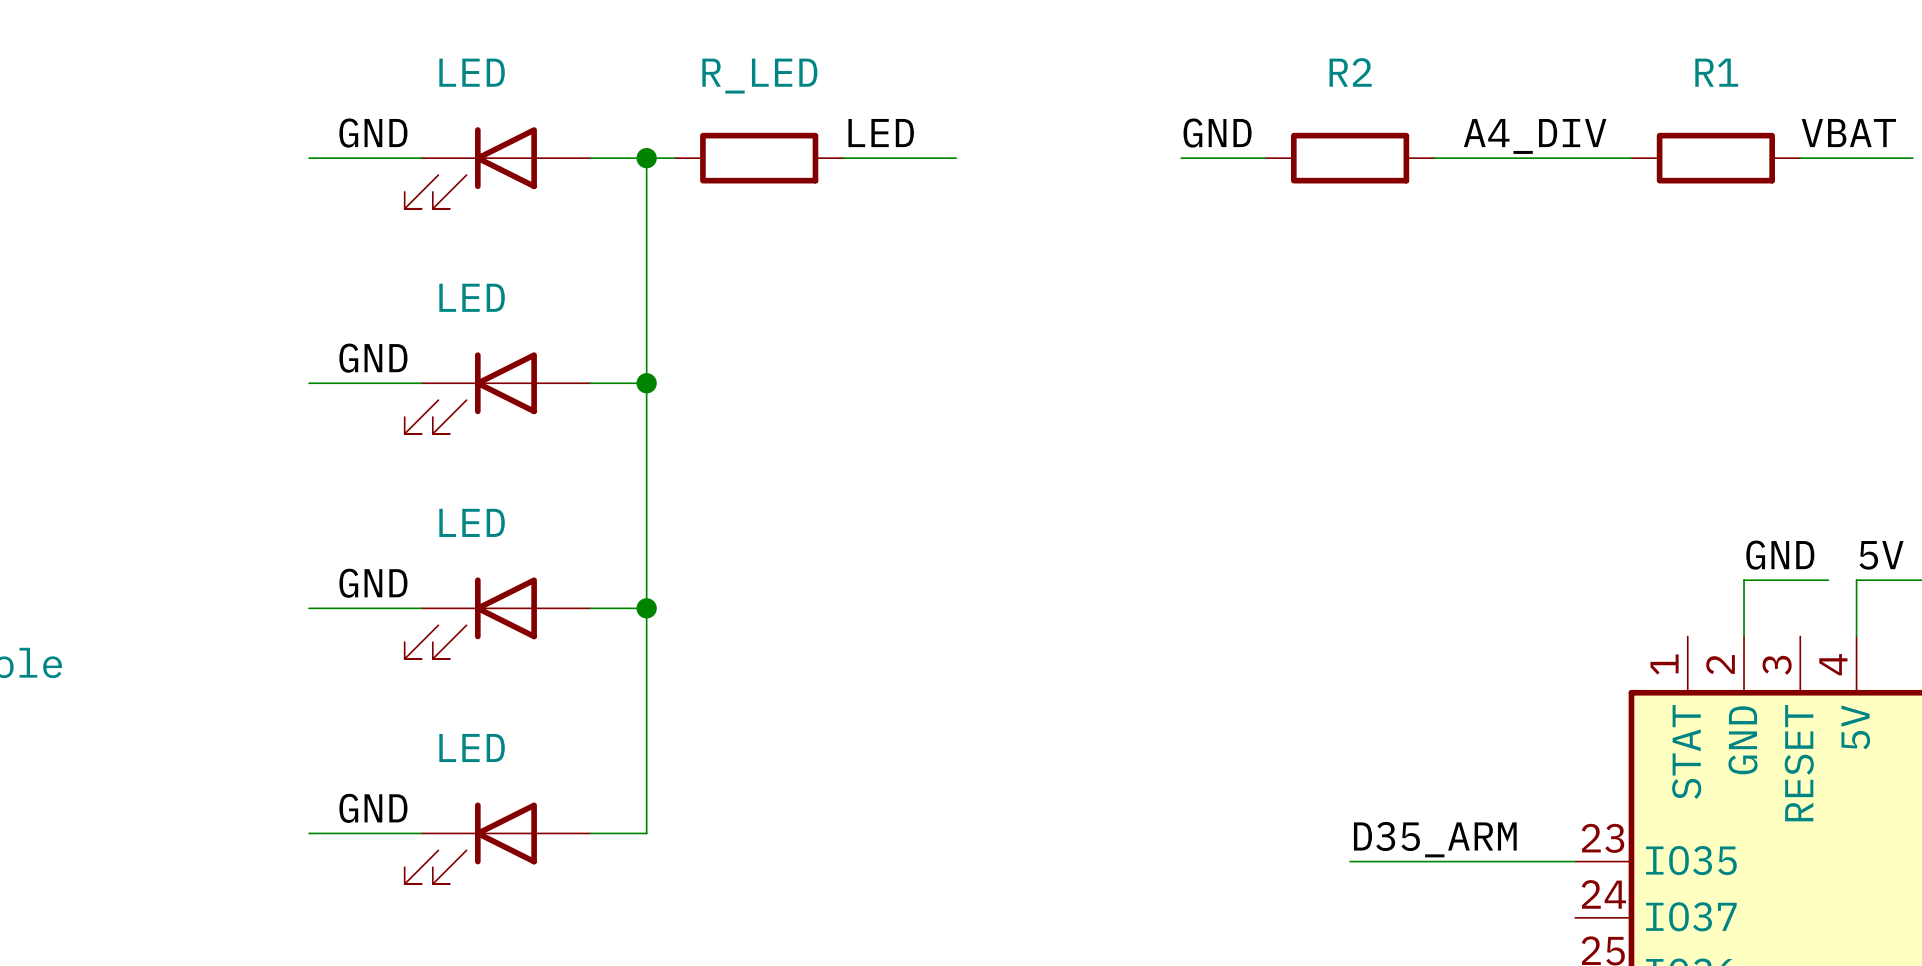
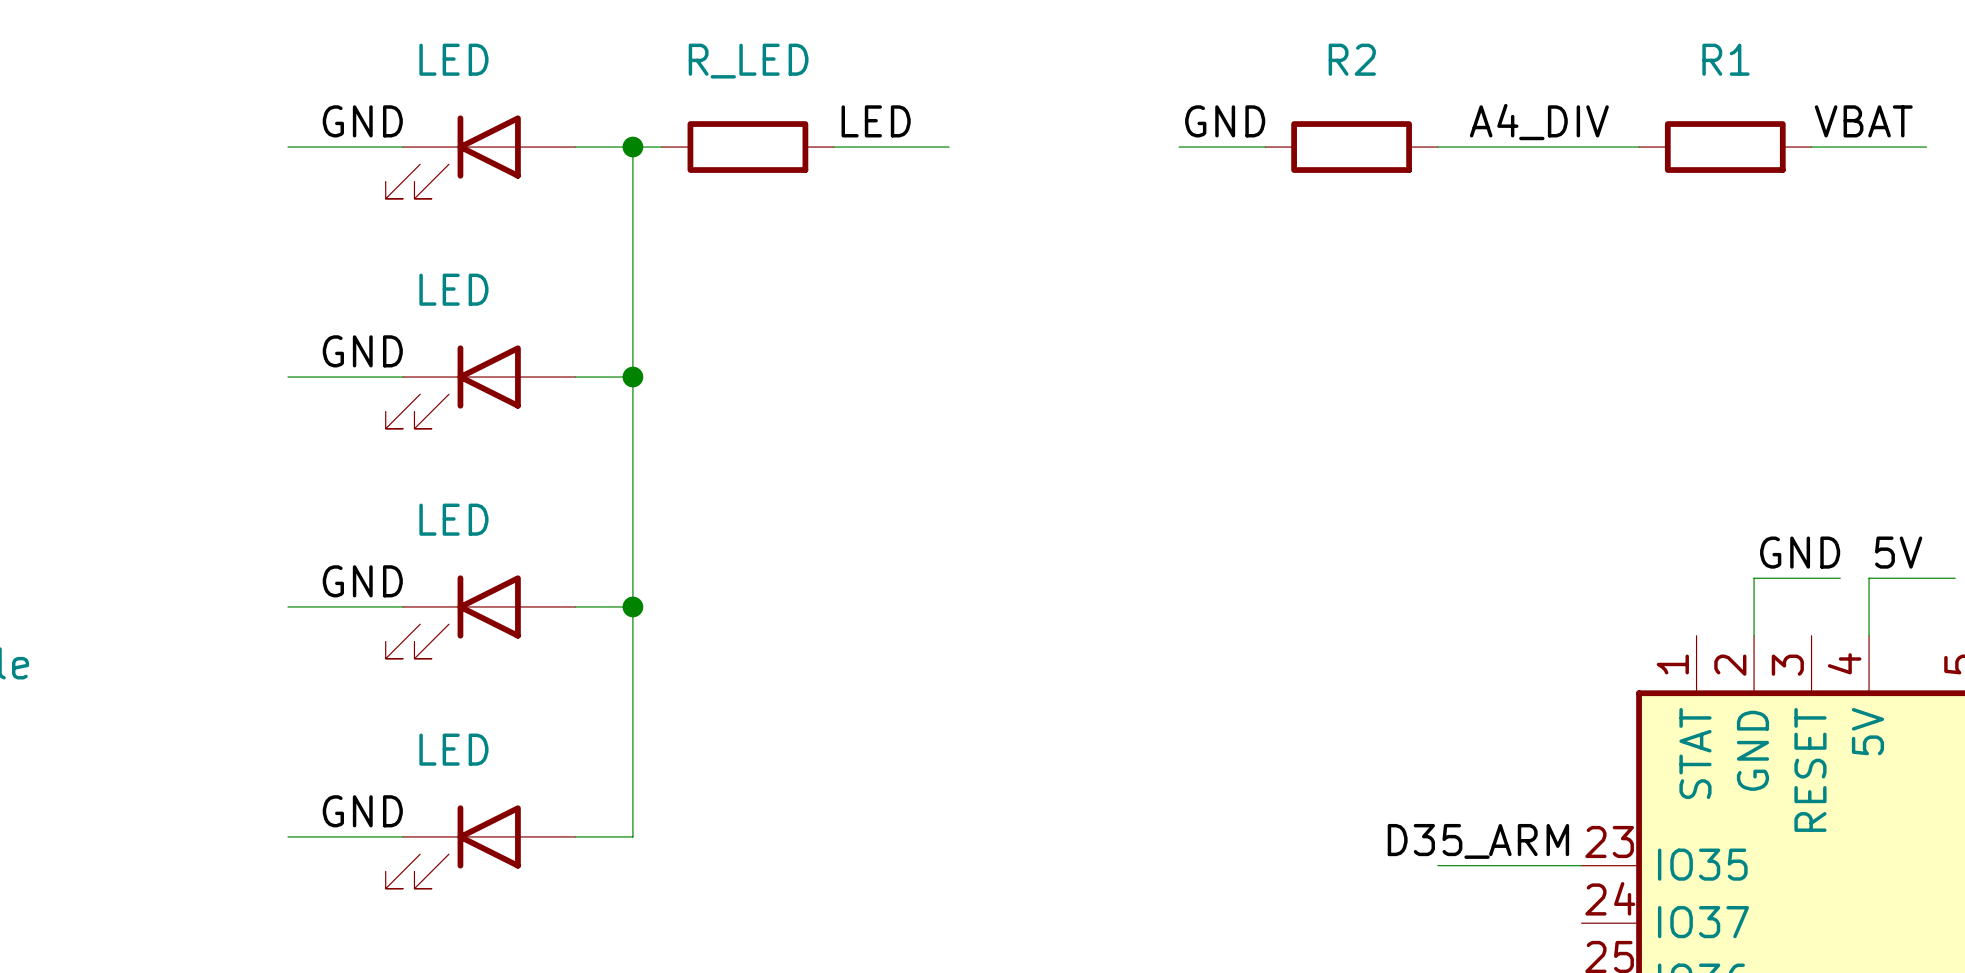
label position: D35_ARM (1435, 839) -> D35_ARM (1478, 841)
wire: (1350, 861) (1434, 861) -> none

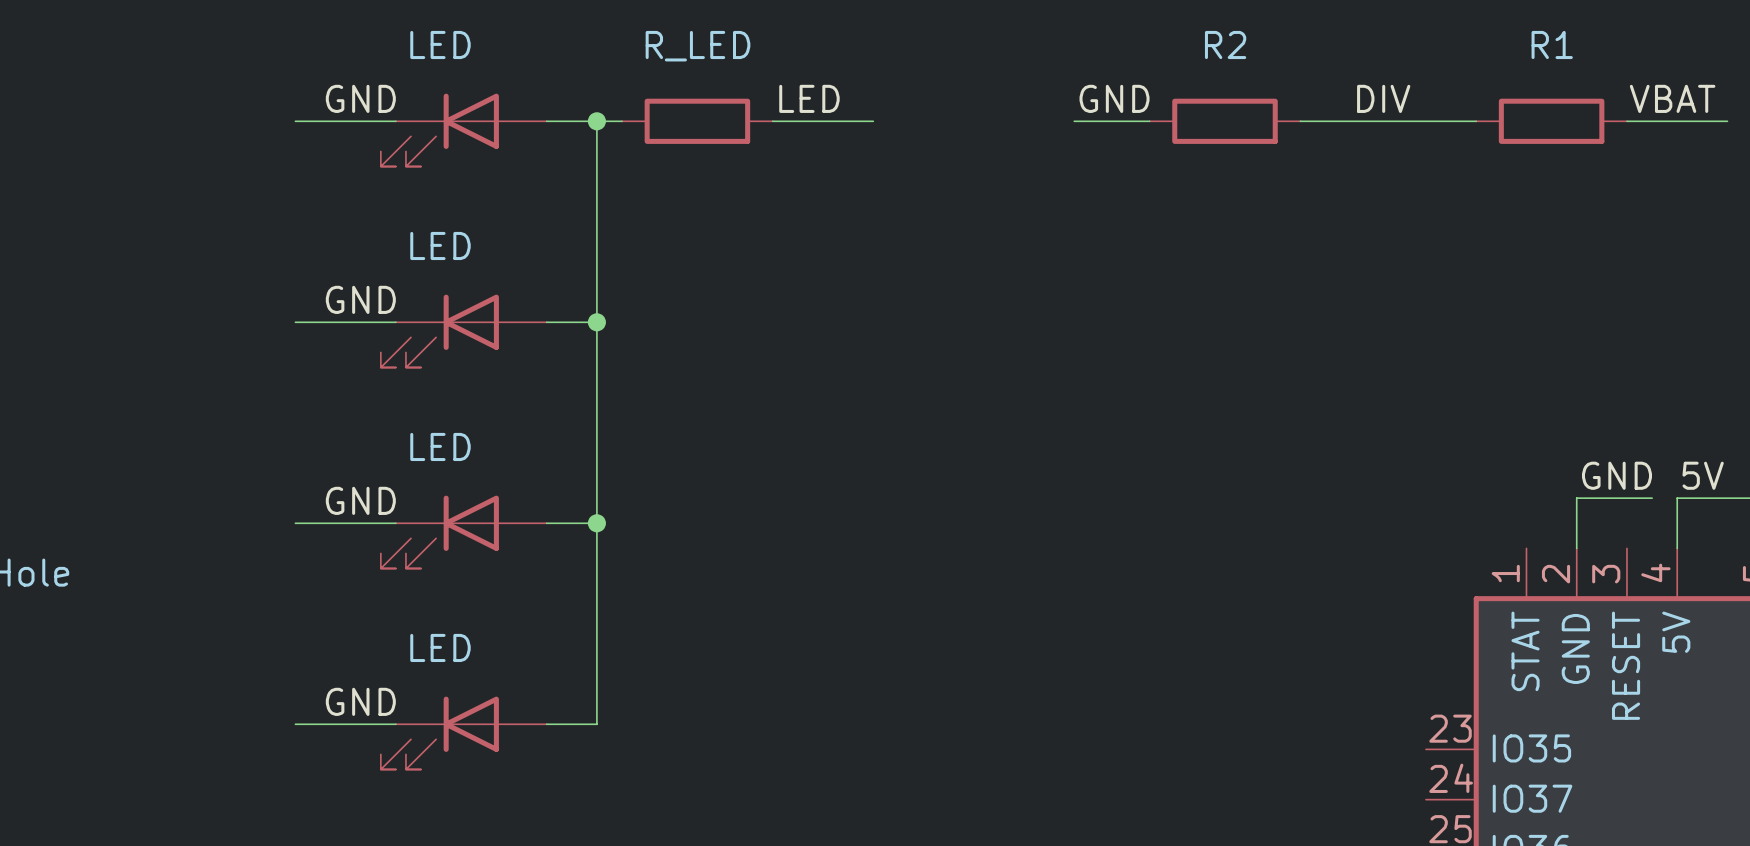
label: A4_DIV (1539, 122) -> DIV (1383, 98)
label: D35_ARM (1478, 841) -> none
wire: (1437, 865) (1581, 865) -> none

